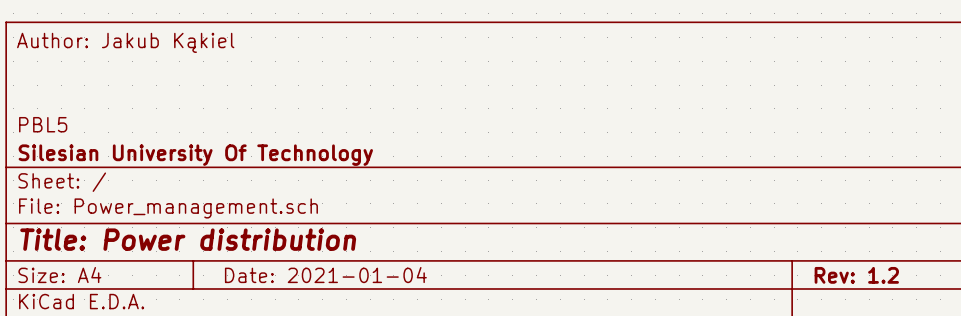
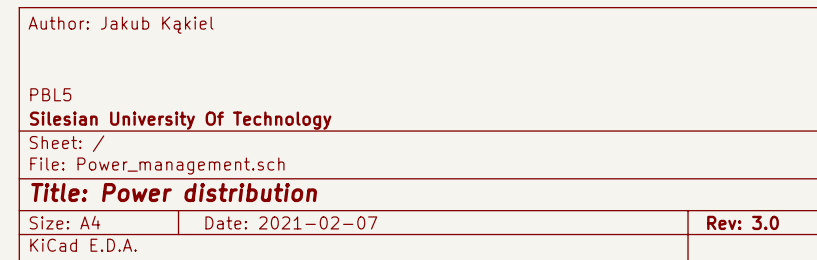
title block: Date: 2021-01-04 (325, 275) -> Date: 2021-02-07 (291, 222)
title block: Rev: 1.2 (856, 275) -> Rev: 3.0 (743, 222)

